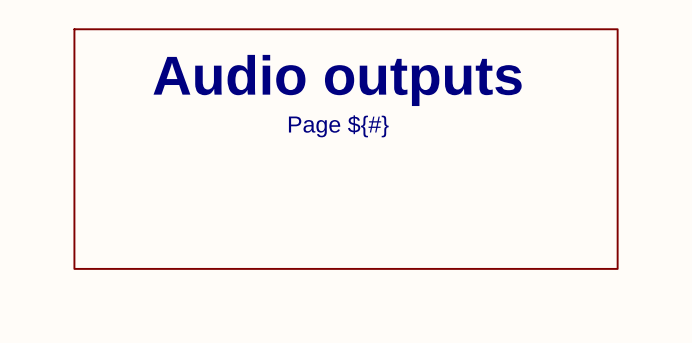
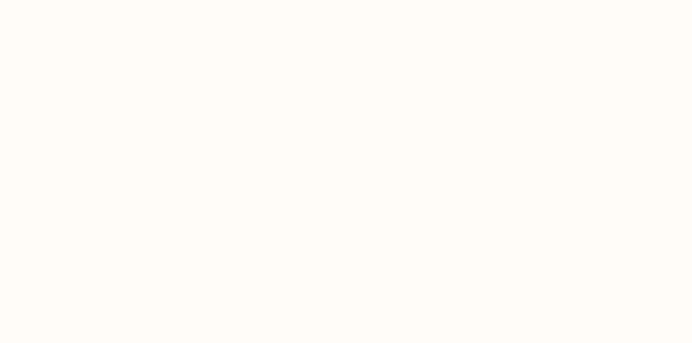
sheet Audio outputs: (346, 149) -> none

